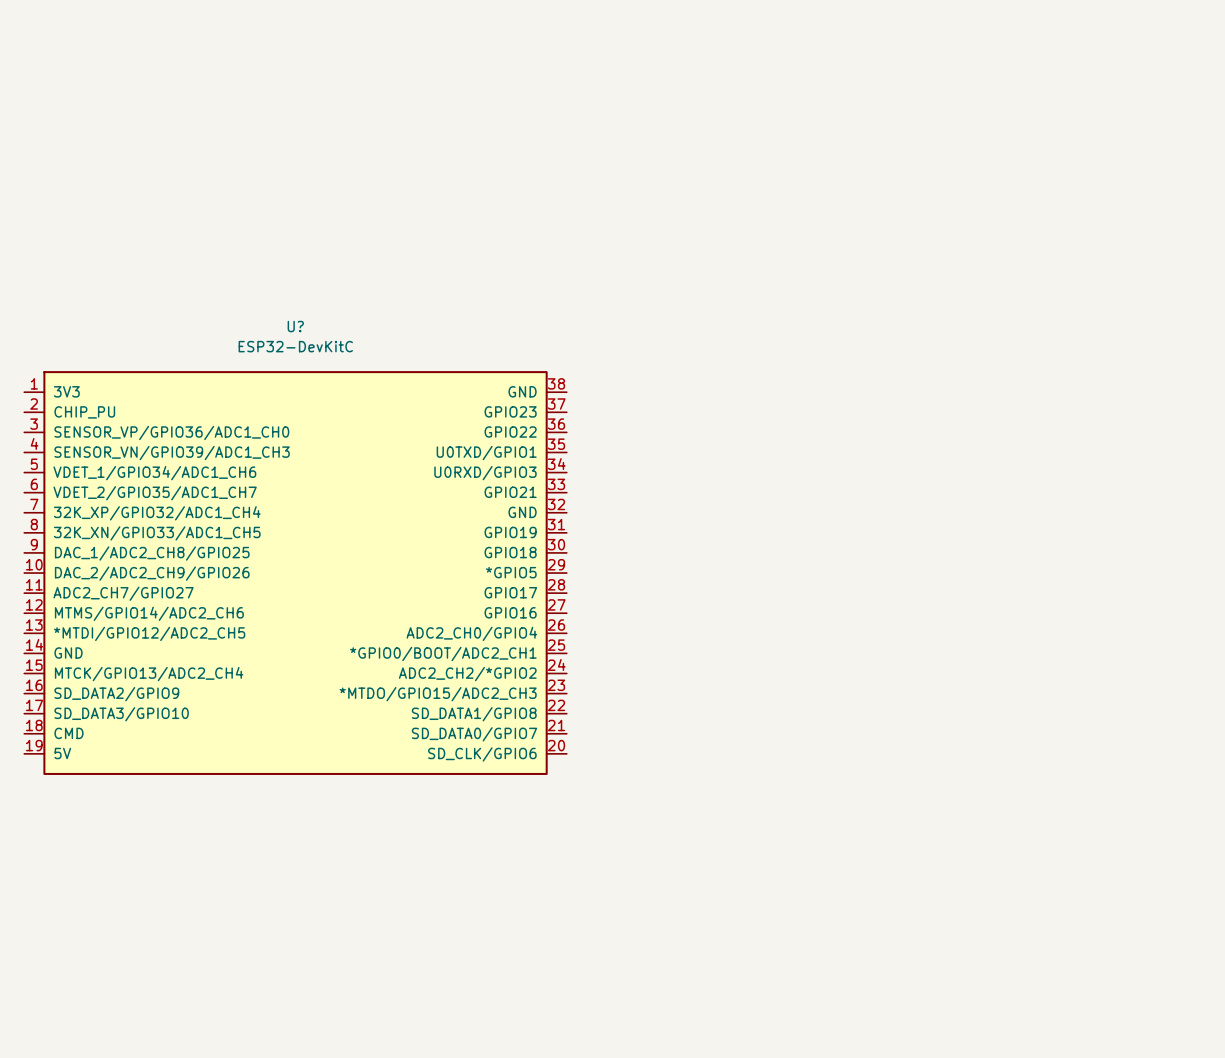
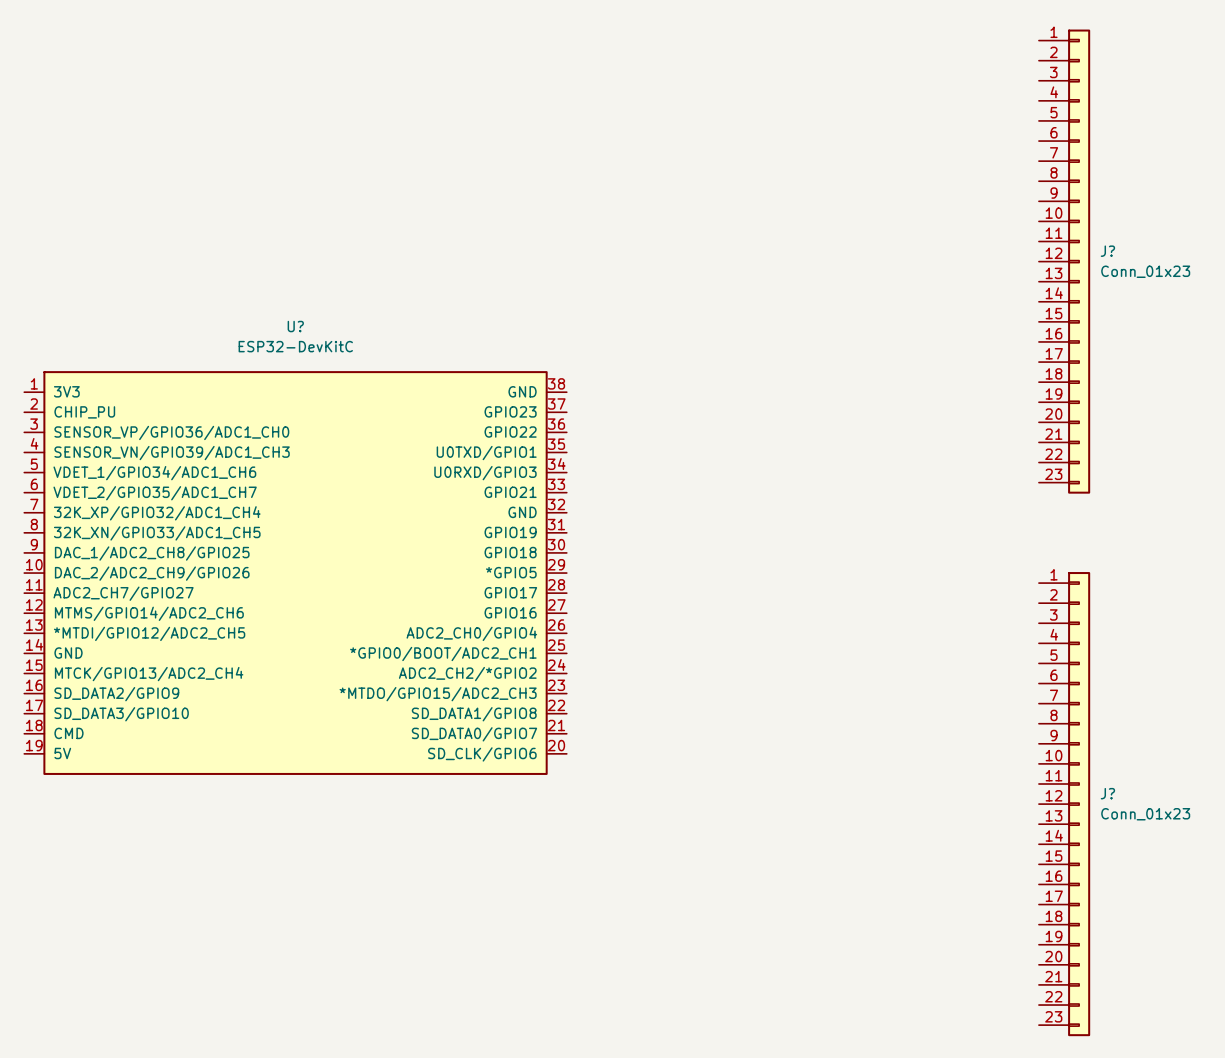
J?: none -> Conn_01x23 (1064, 261)
J?: none -> Conn_01x23 (1064, 804)

